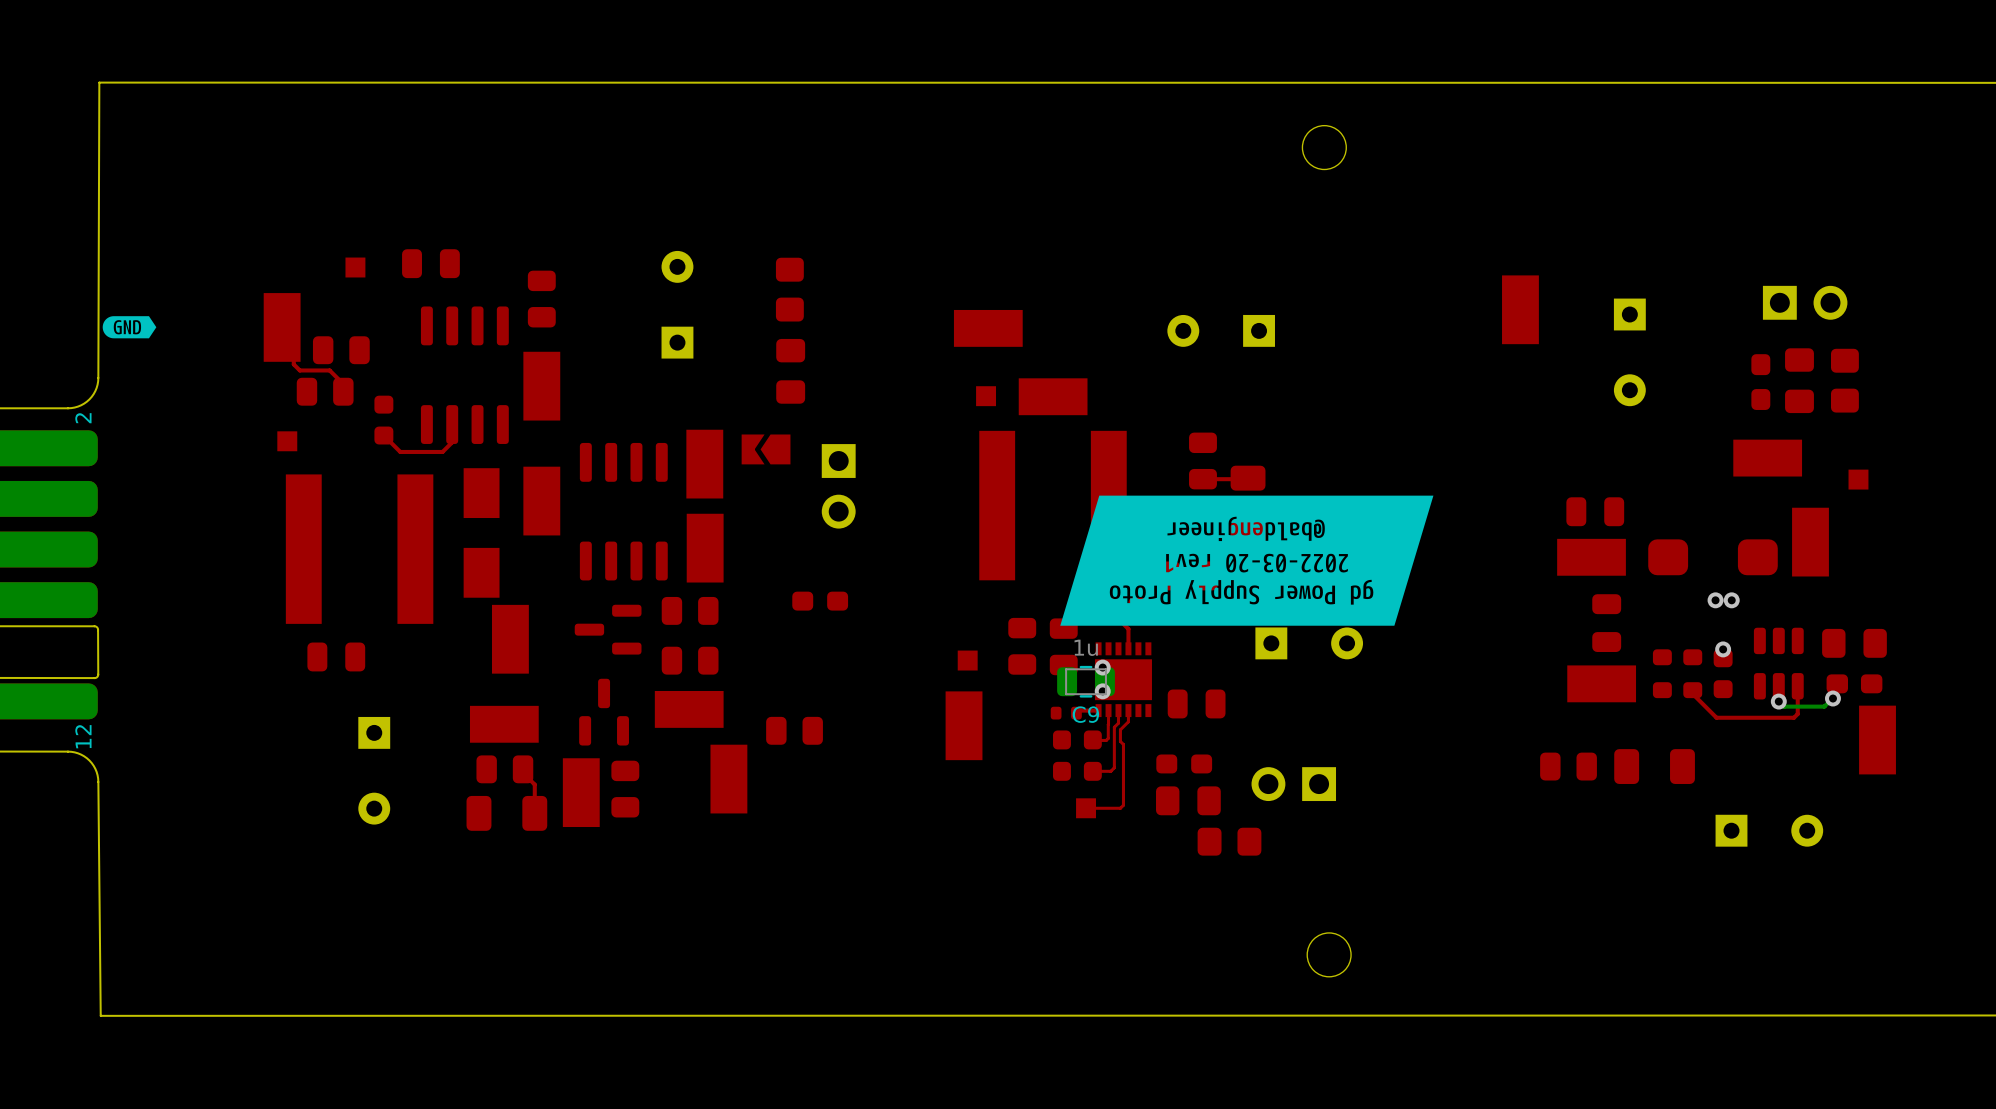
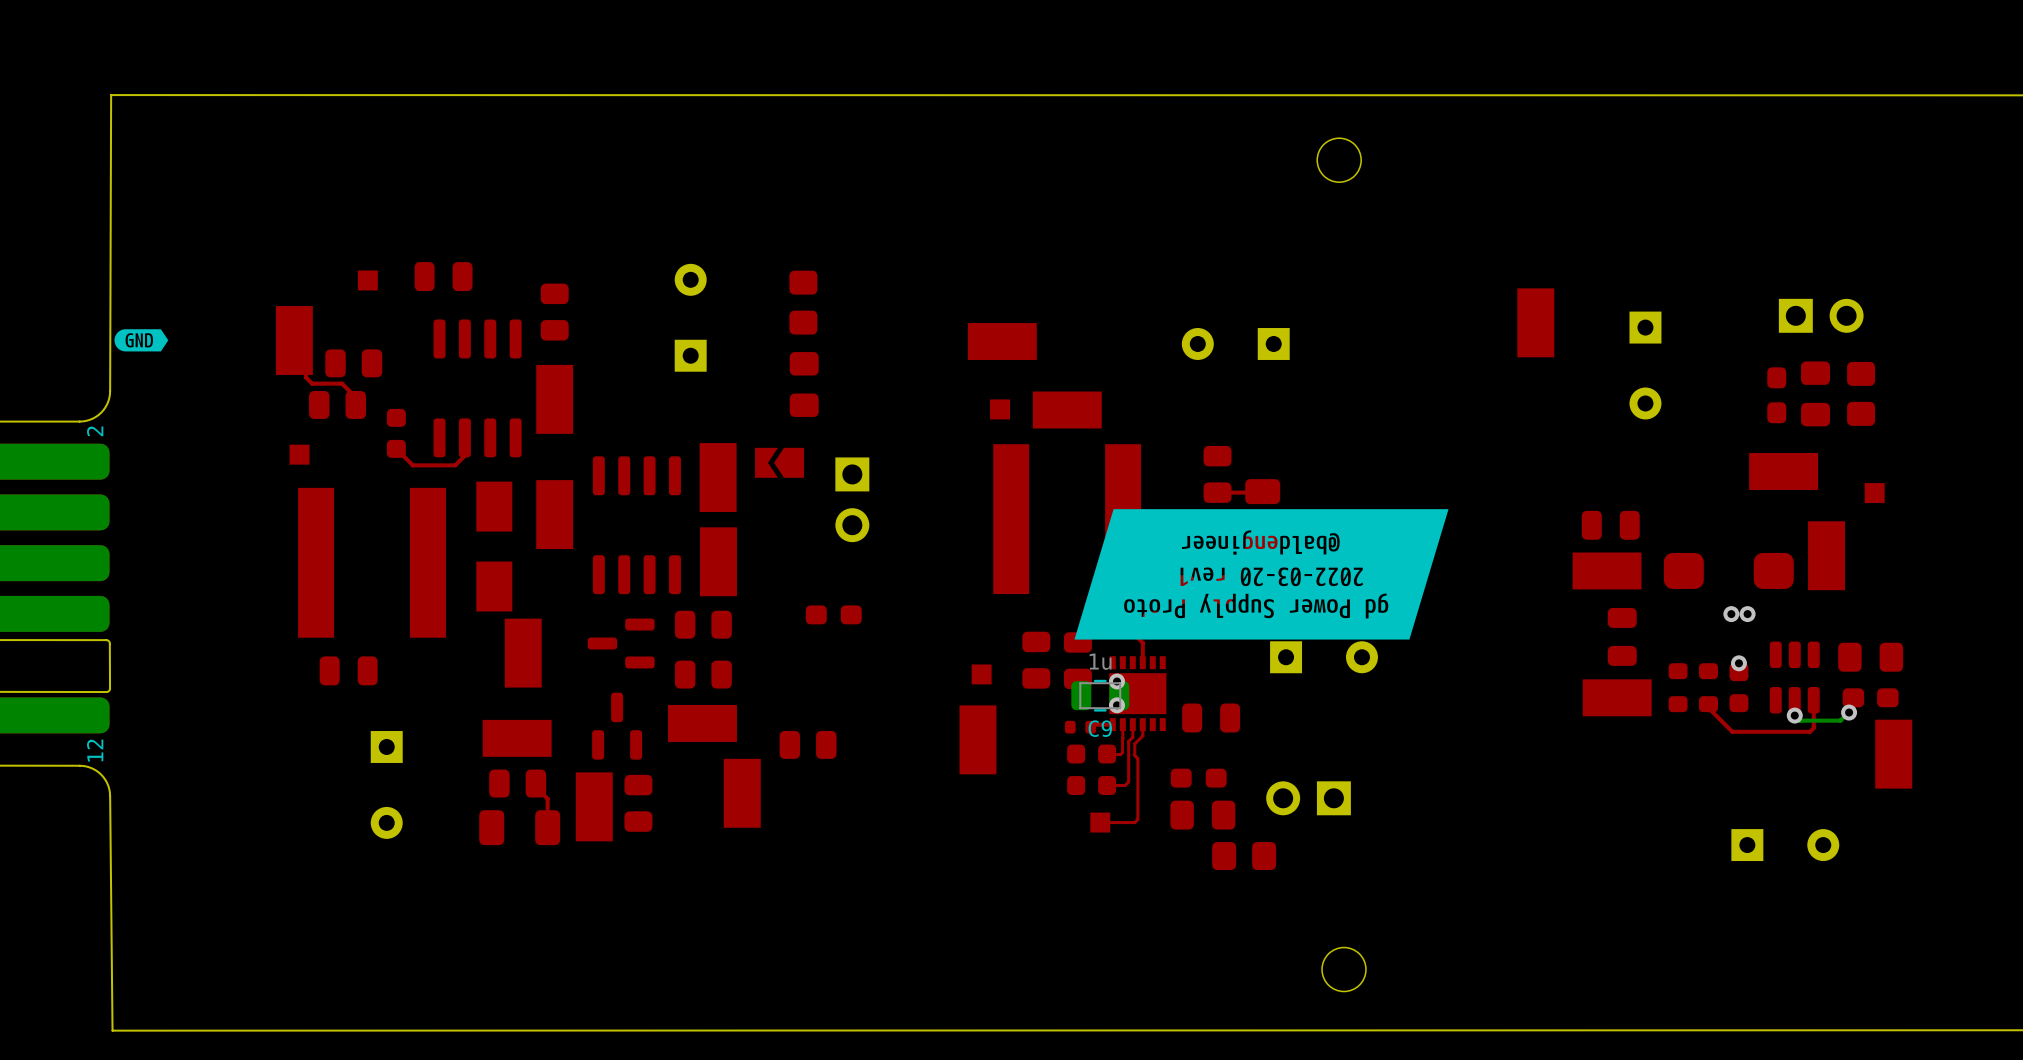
part: (1568, 766) -> none
part: (1654, 766) -> none

